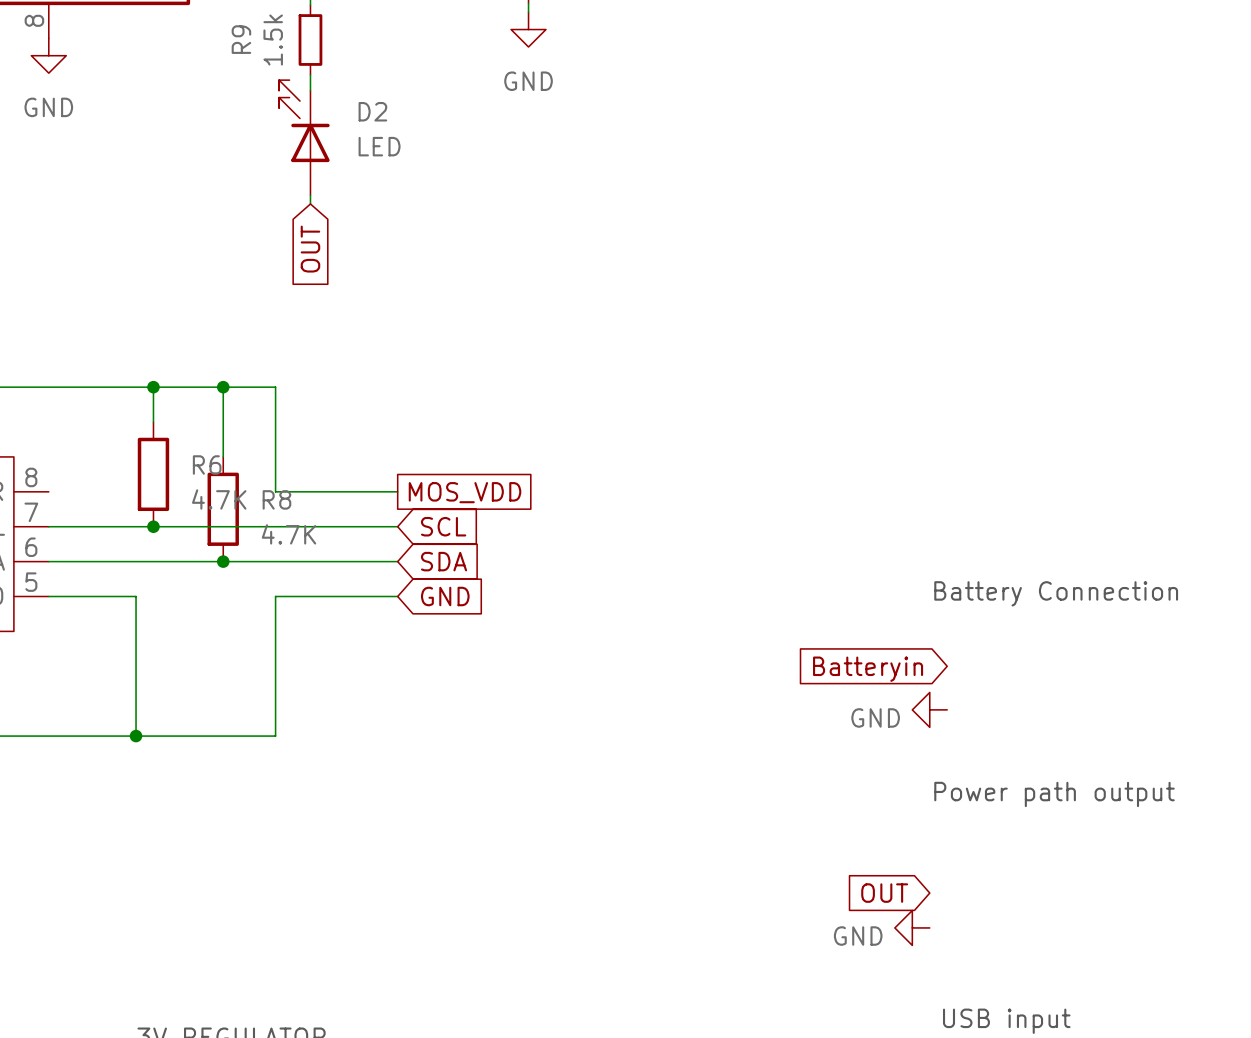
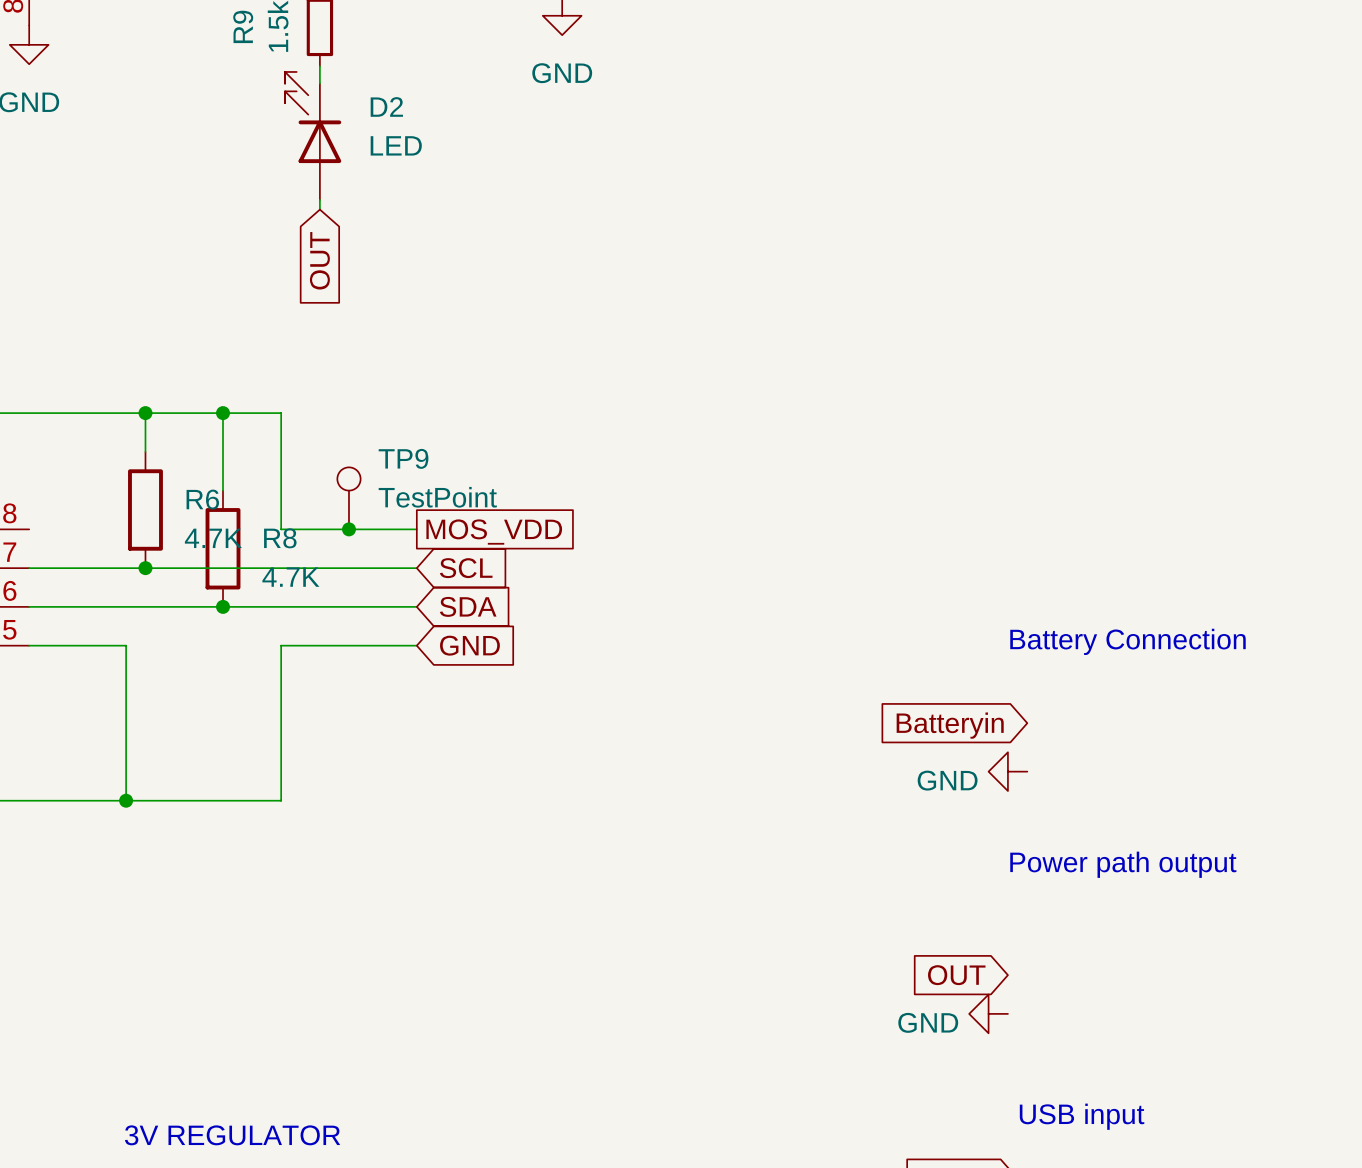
TP9: none -> TestPoint (348, 498)
junction: none -> (348, 529)

